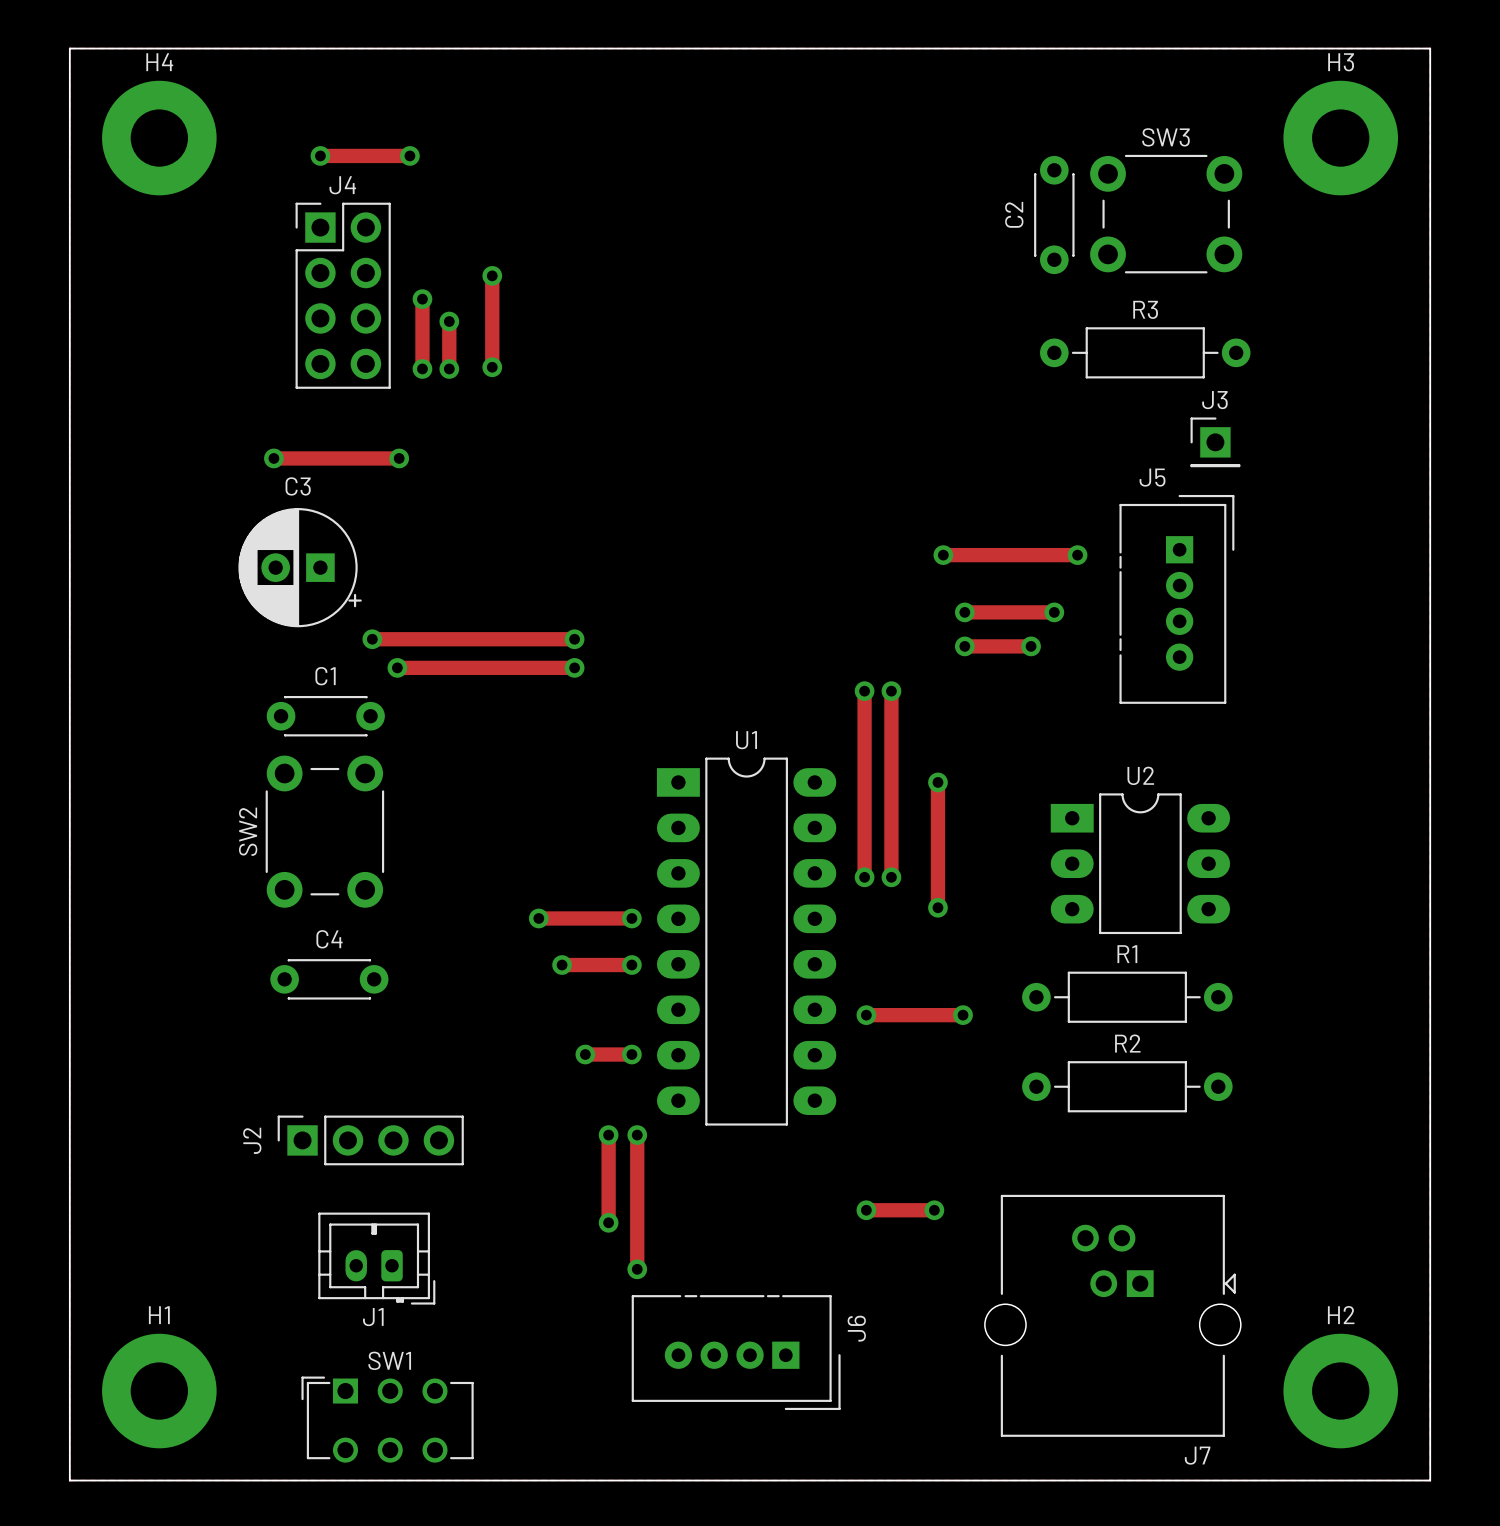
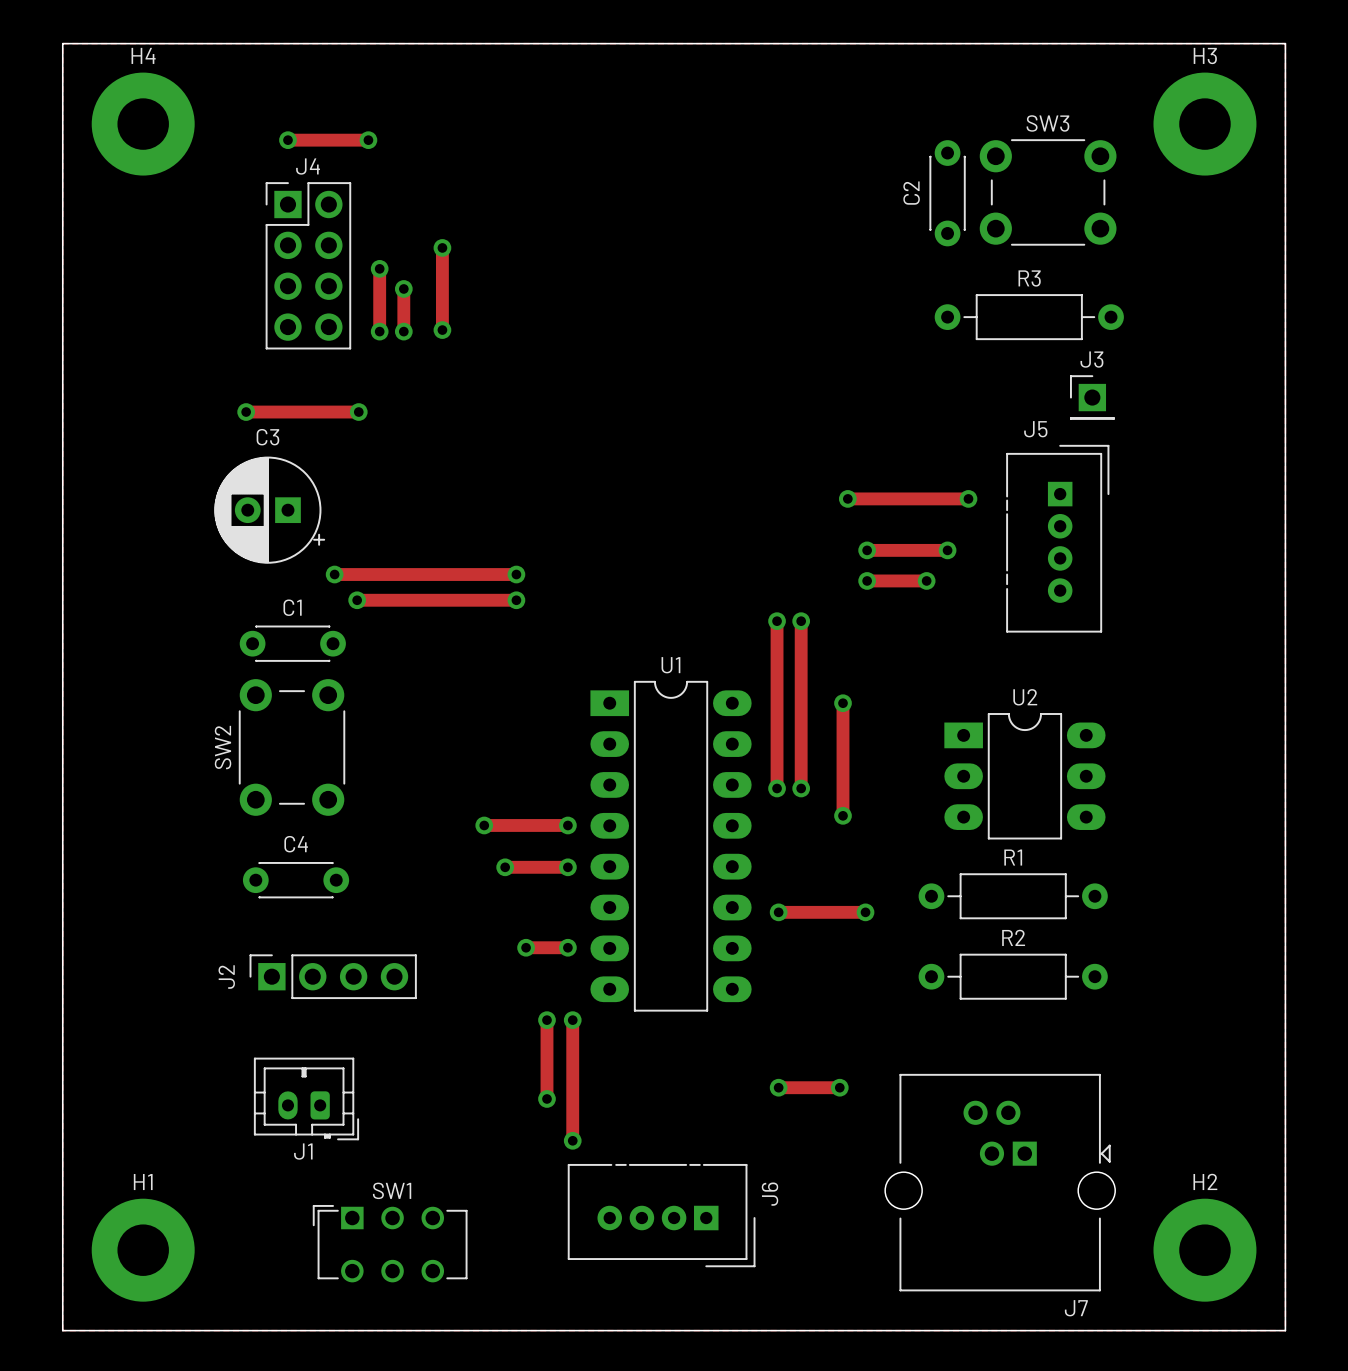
J2 position: (370, 1140) -> (333, 976)
J1 position: (376, 1258) -> (306, 1098)
SW1 position: (387, 1419) -> (390, 1243)

